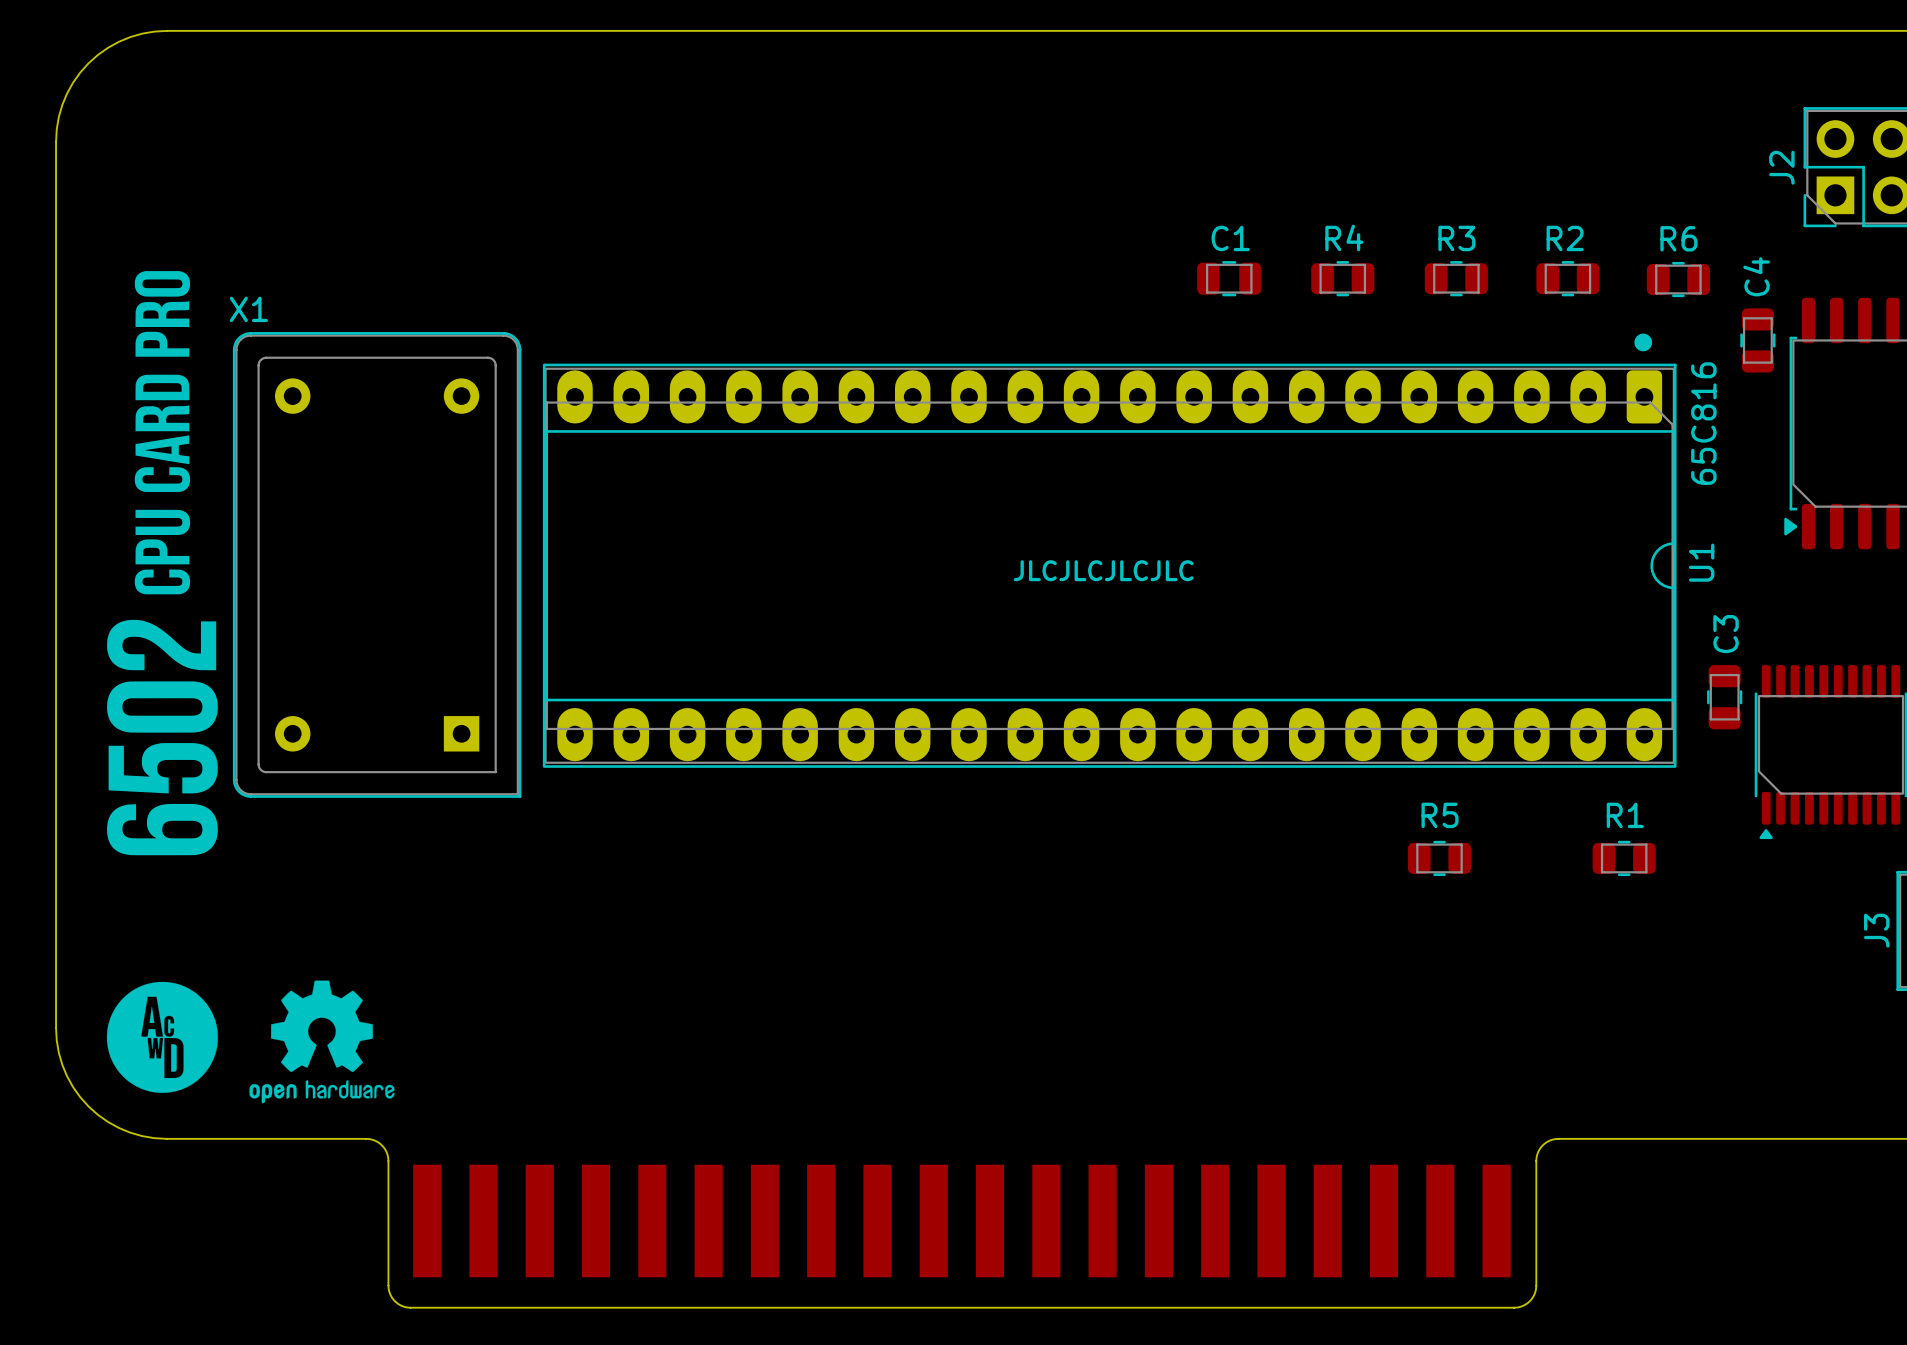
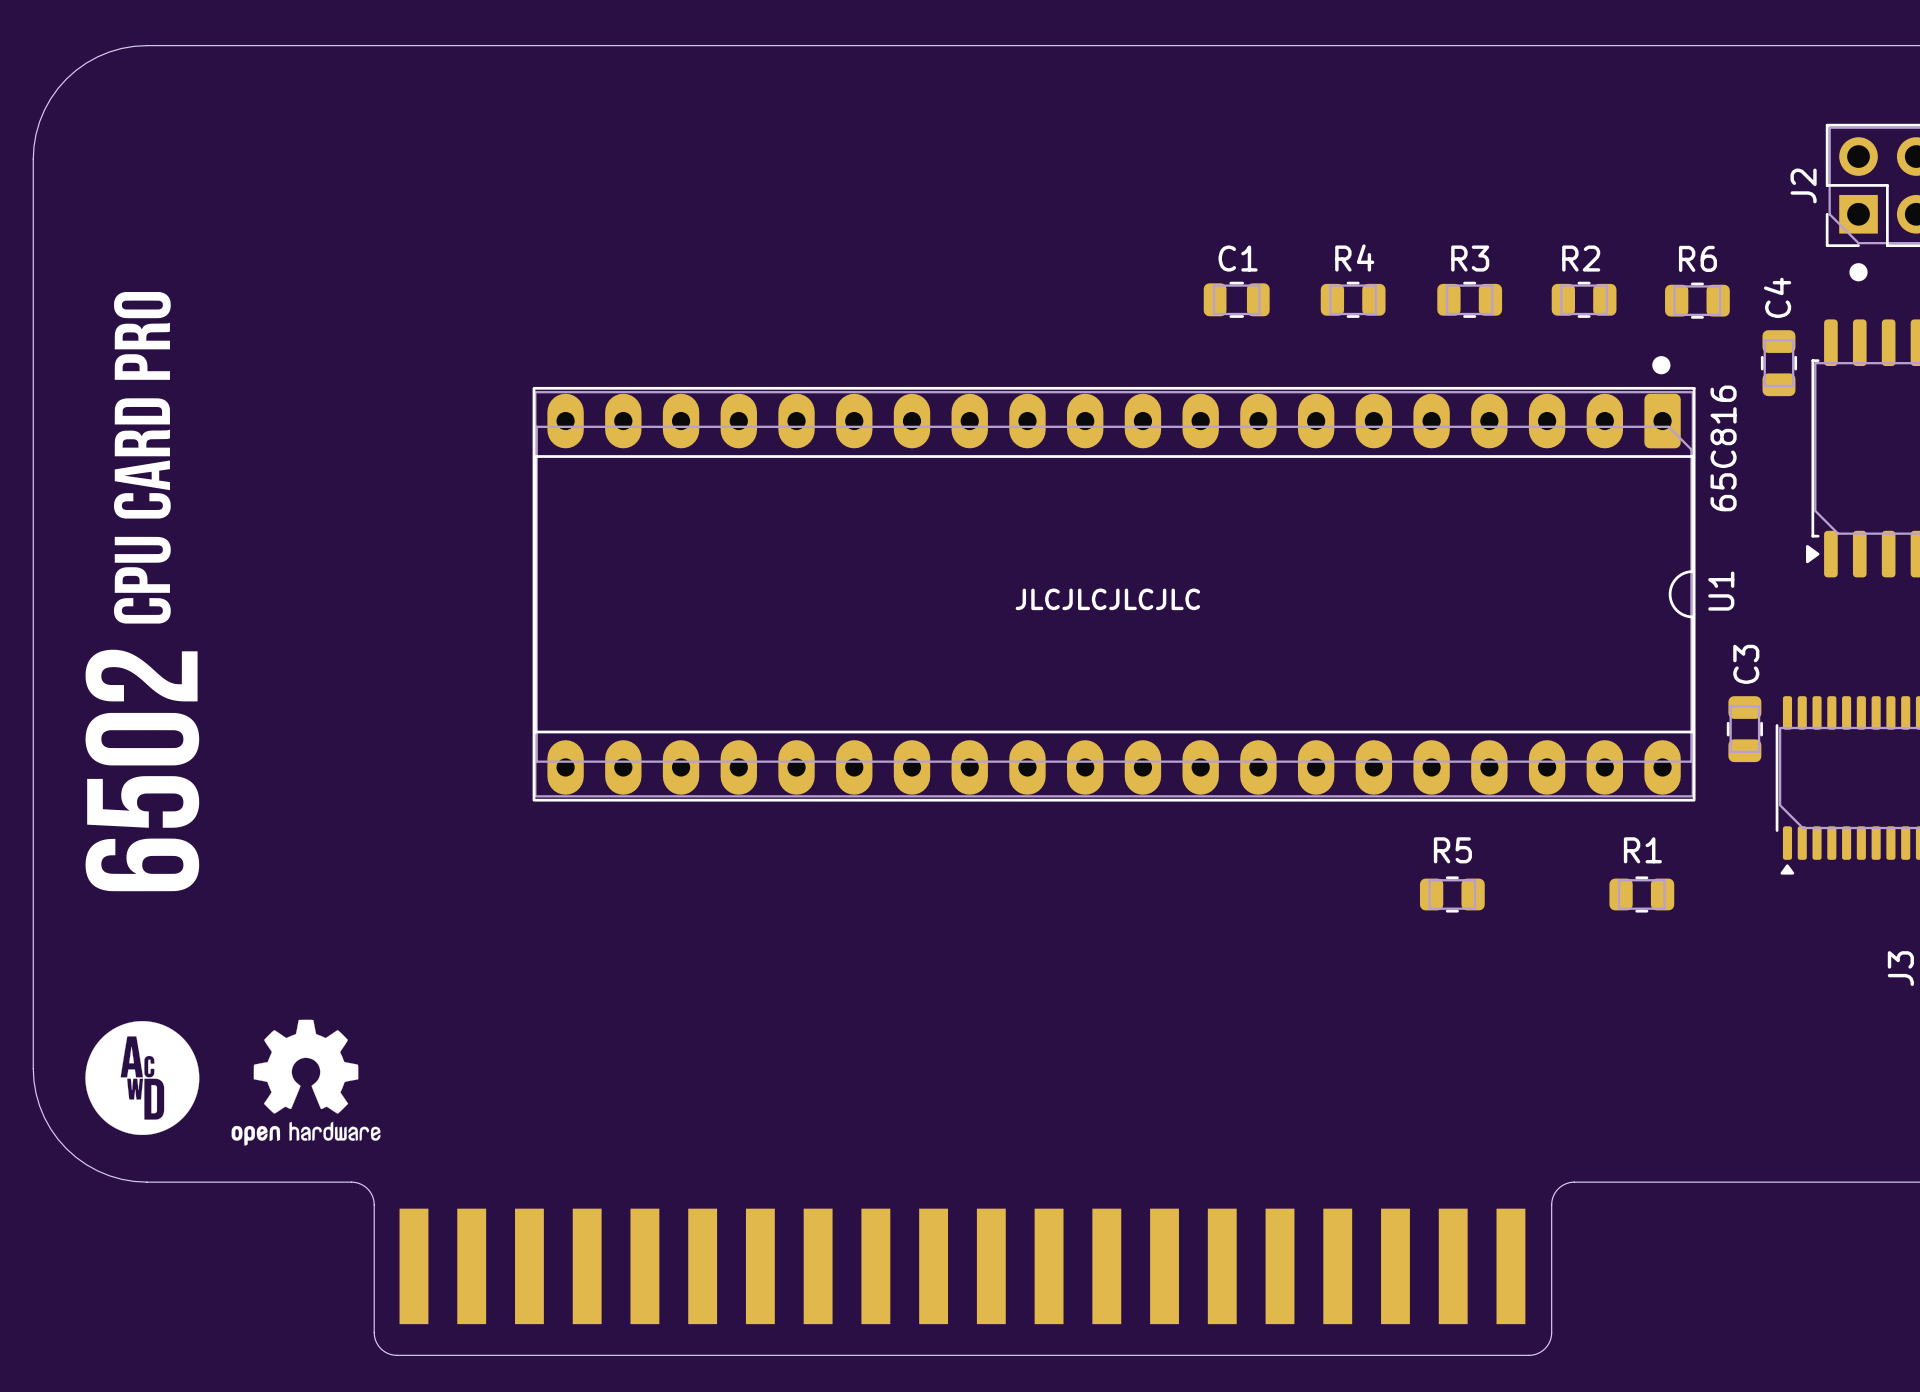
drawing: none -> [1849, 263, 1868, 282]
X1: (377, 564) -> none

